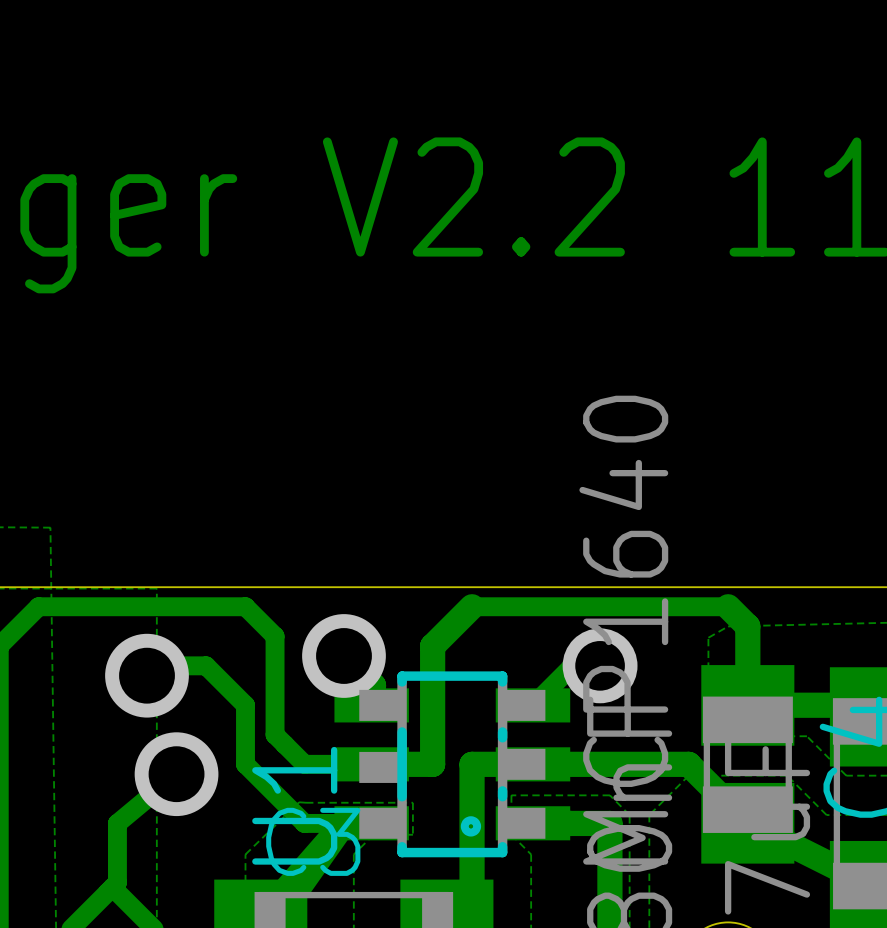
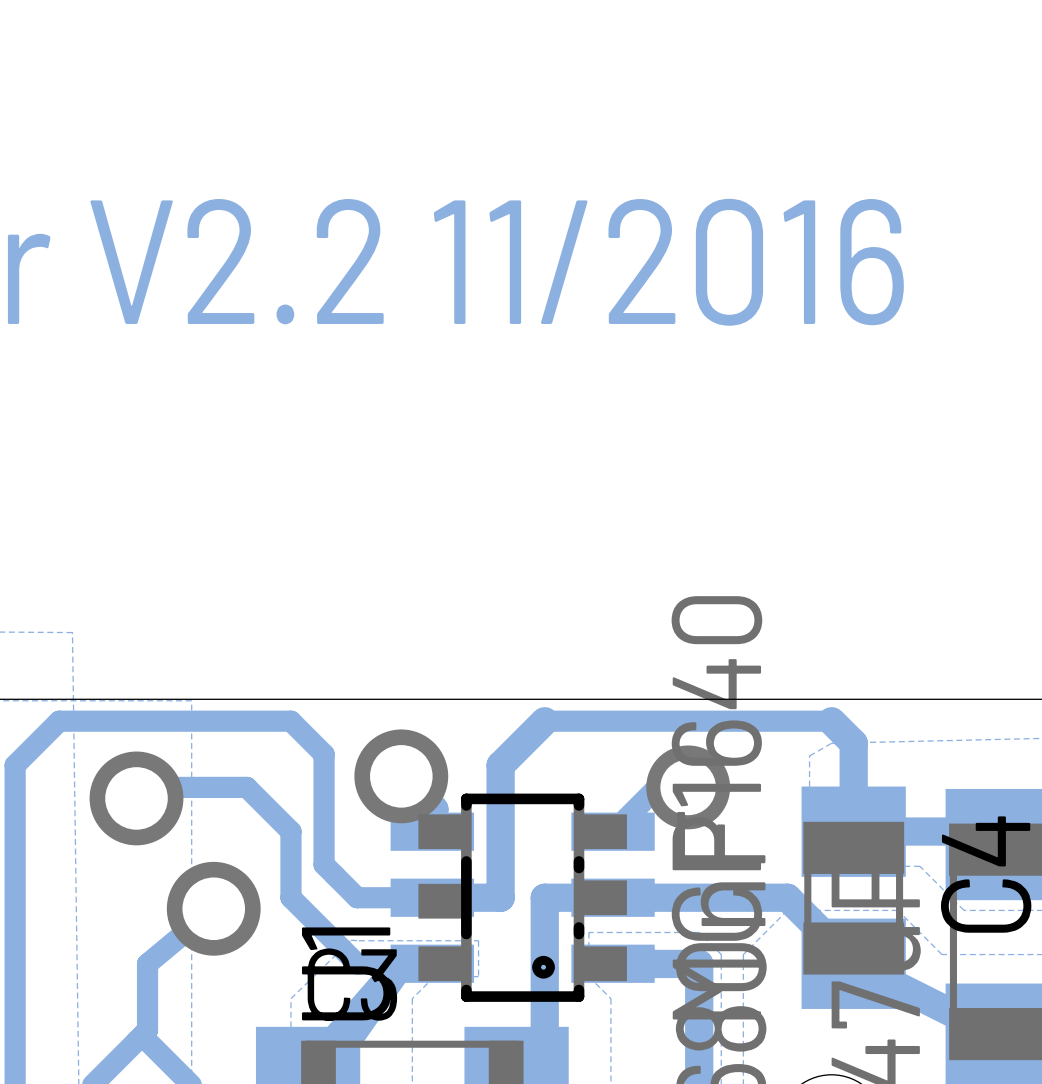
via position: (147, 675) -> (136, 798)

